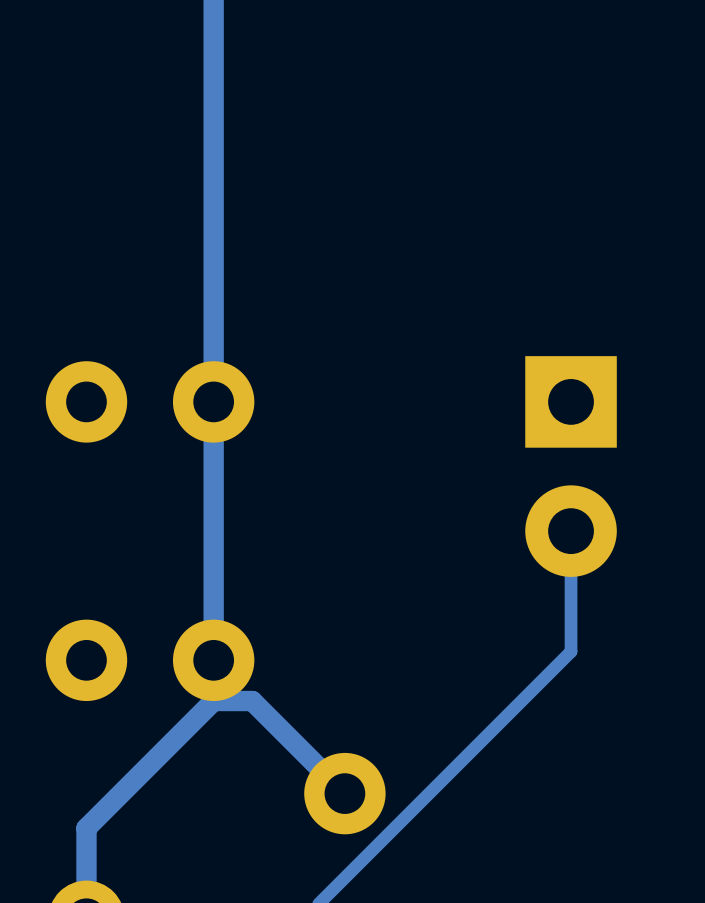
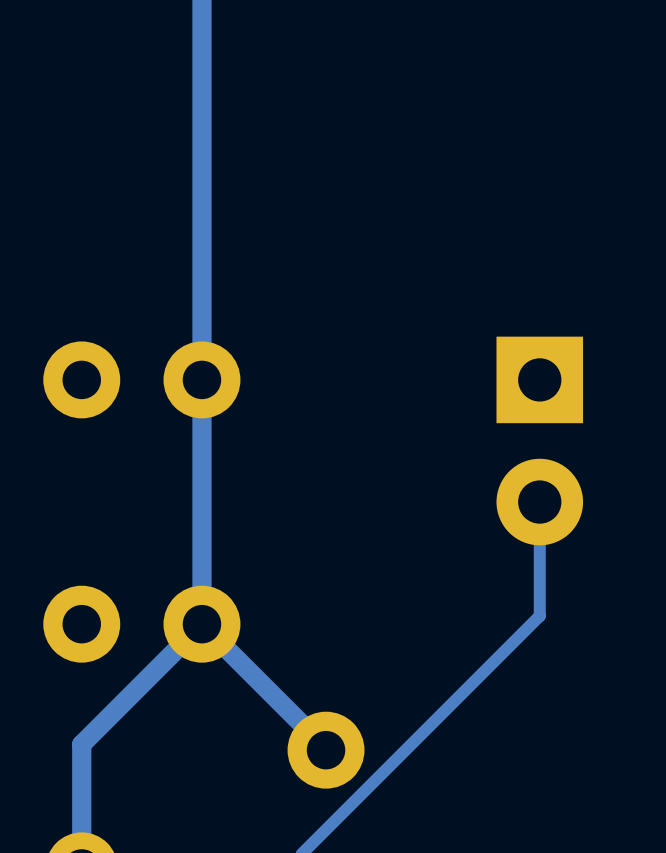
track: (213, 701) (86, 828) -> (326, 750) (201, 624) (81, 744) (81, 782)
track: (213, 701) (252, 701) (344, 793) -> none

